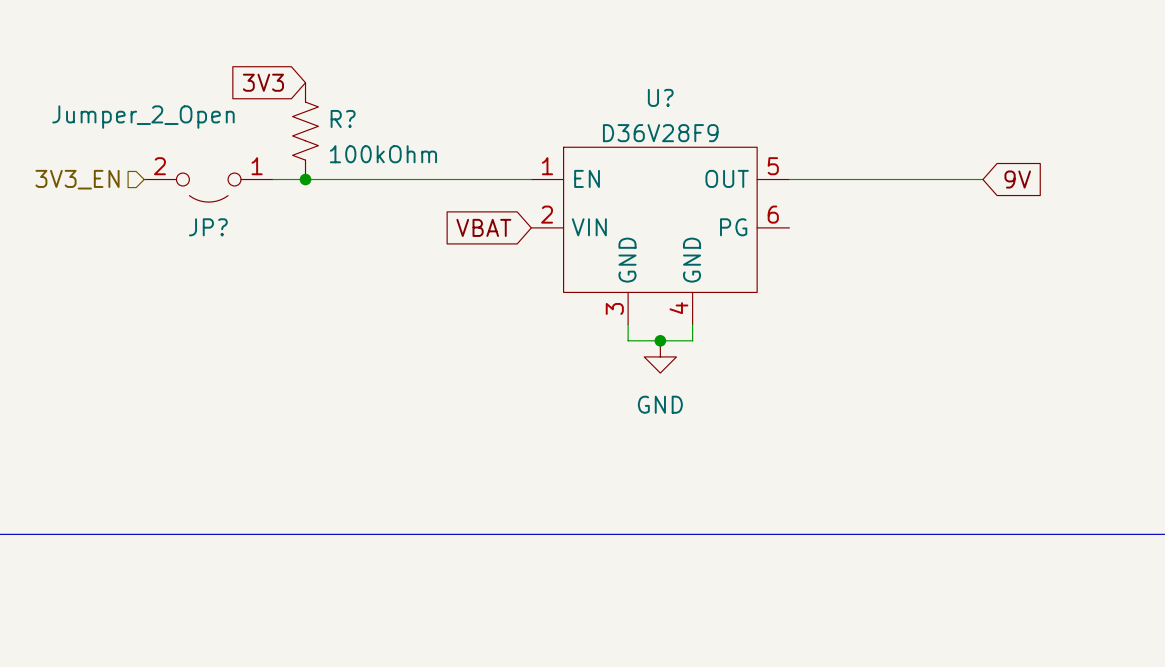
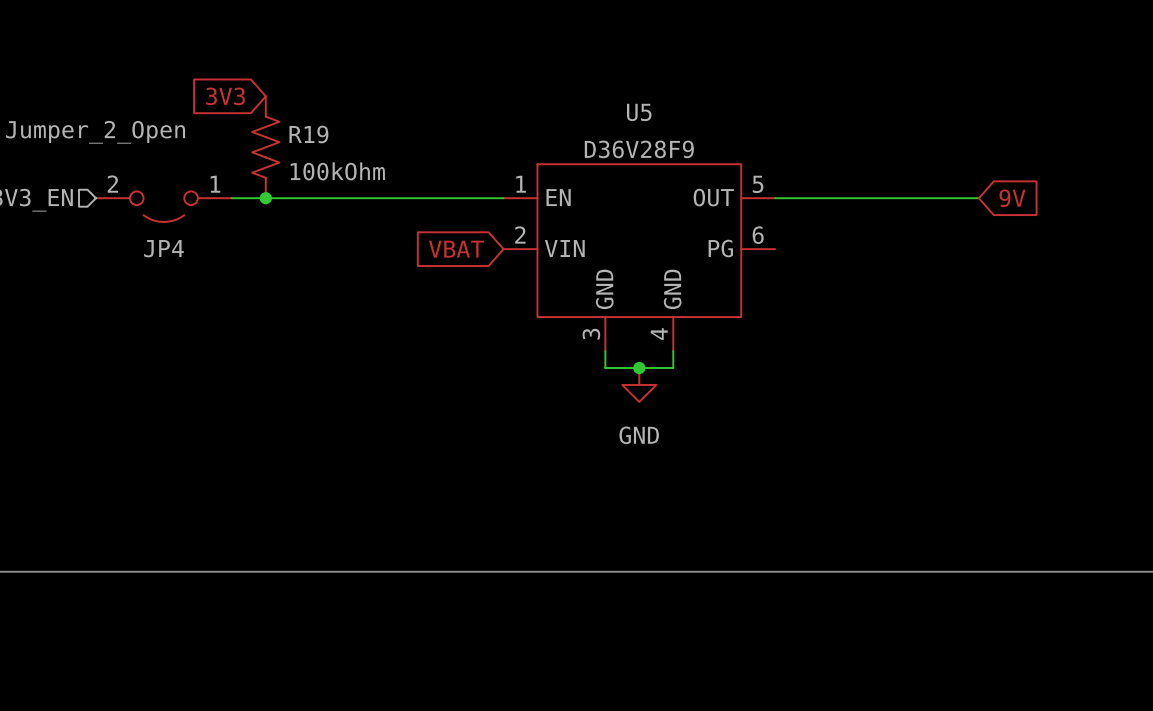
U? name: U? (660, 97) -> U5 (639, 112)
R? name: R? (343, 118) -> R19 (308, 134)
JP? name: JP? (208, 227) -> JP4 (163, 248)

